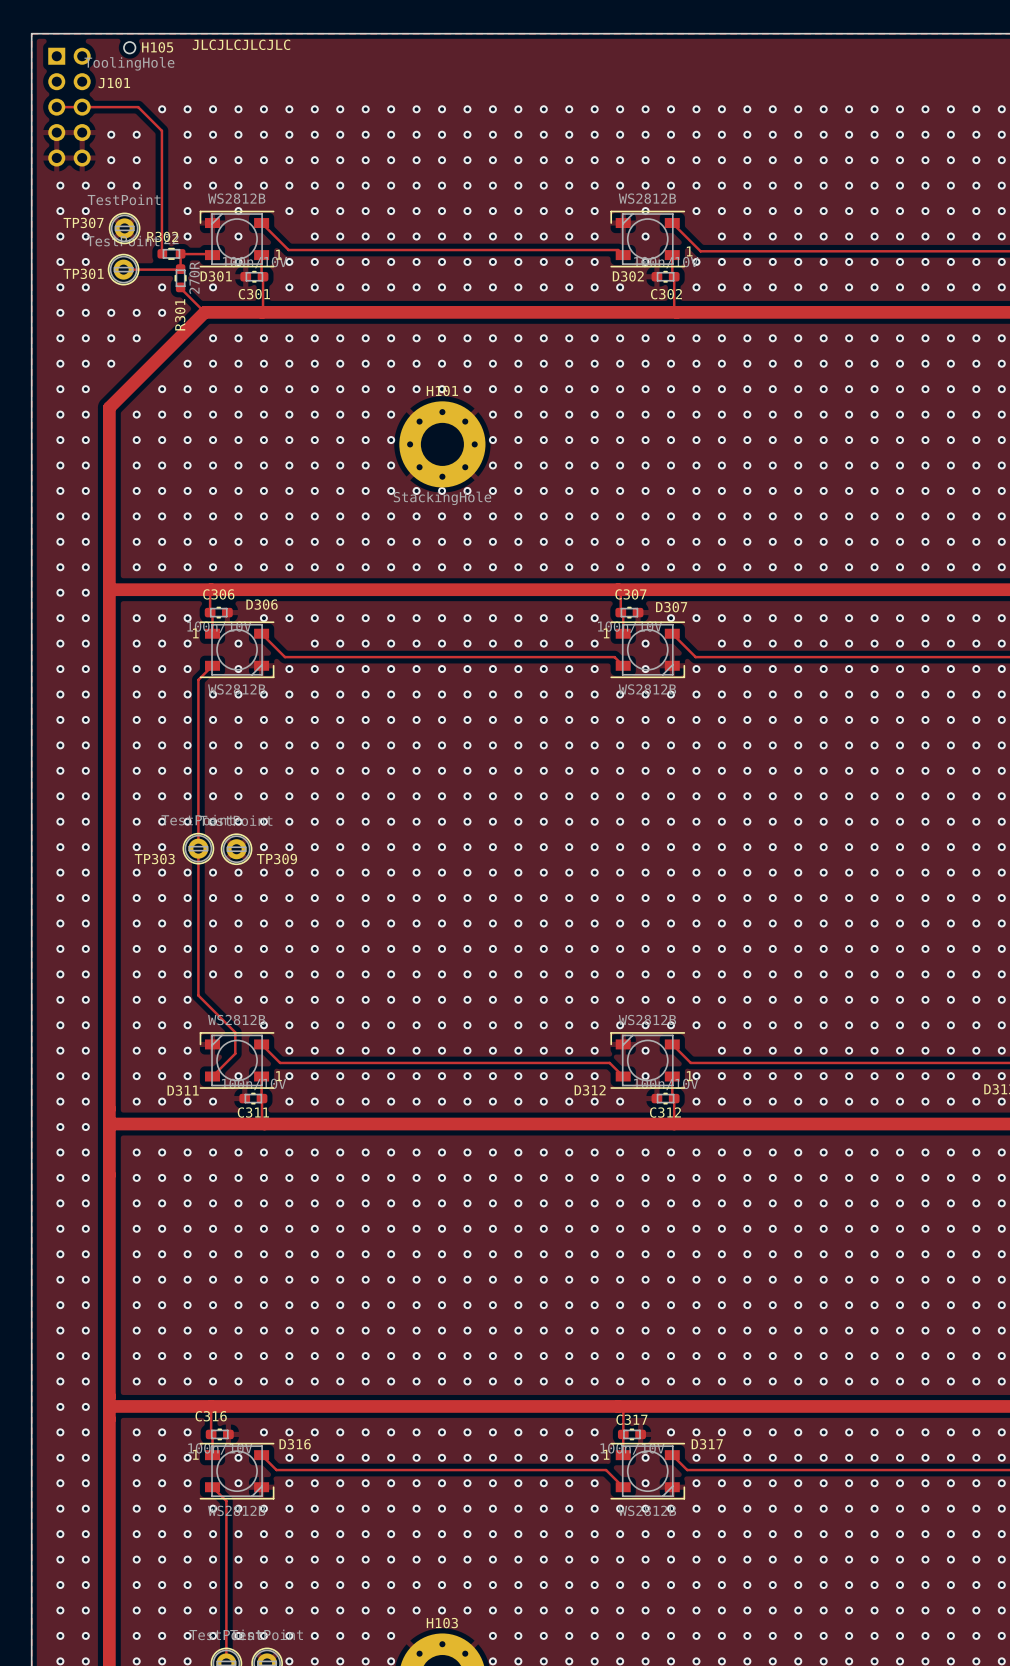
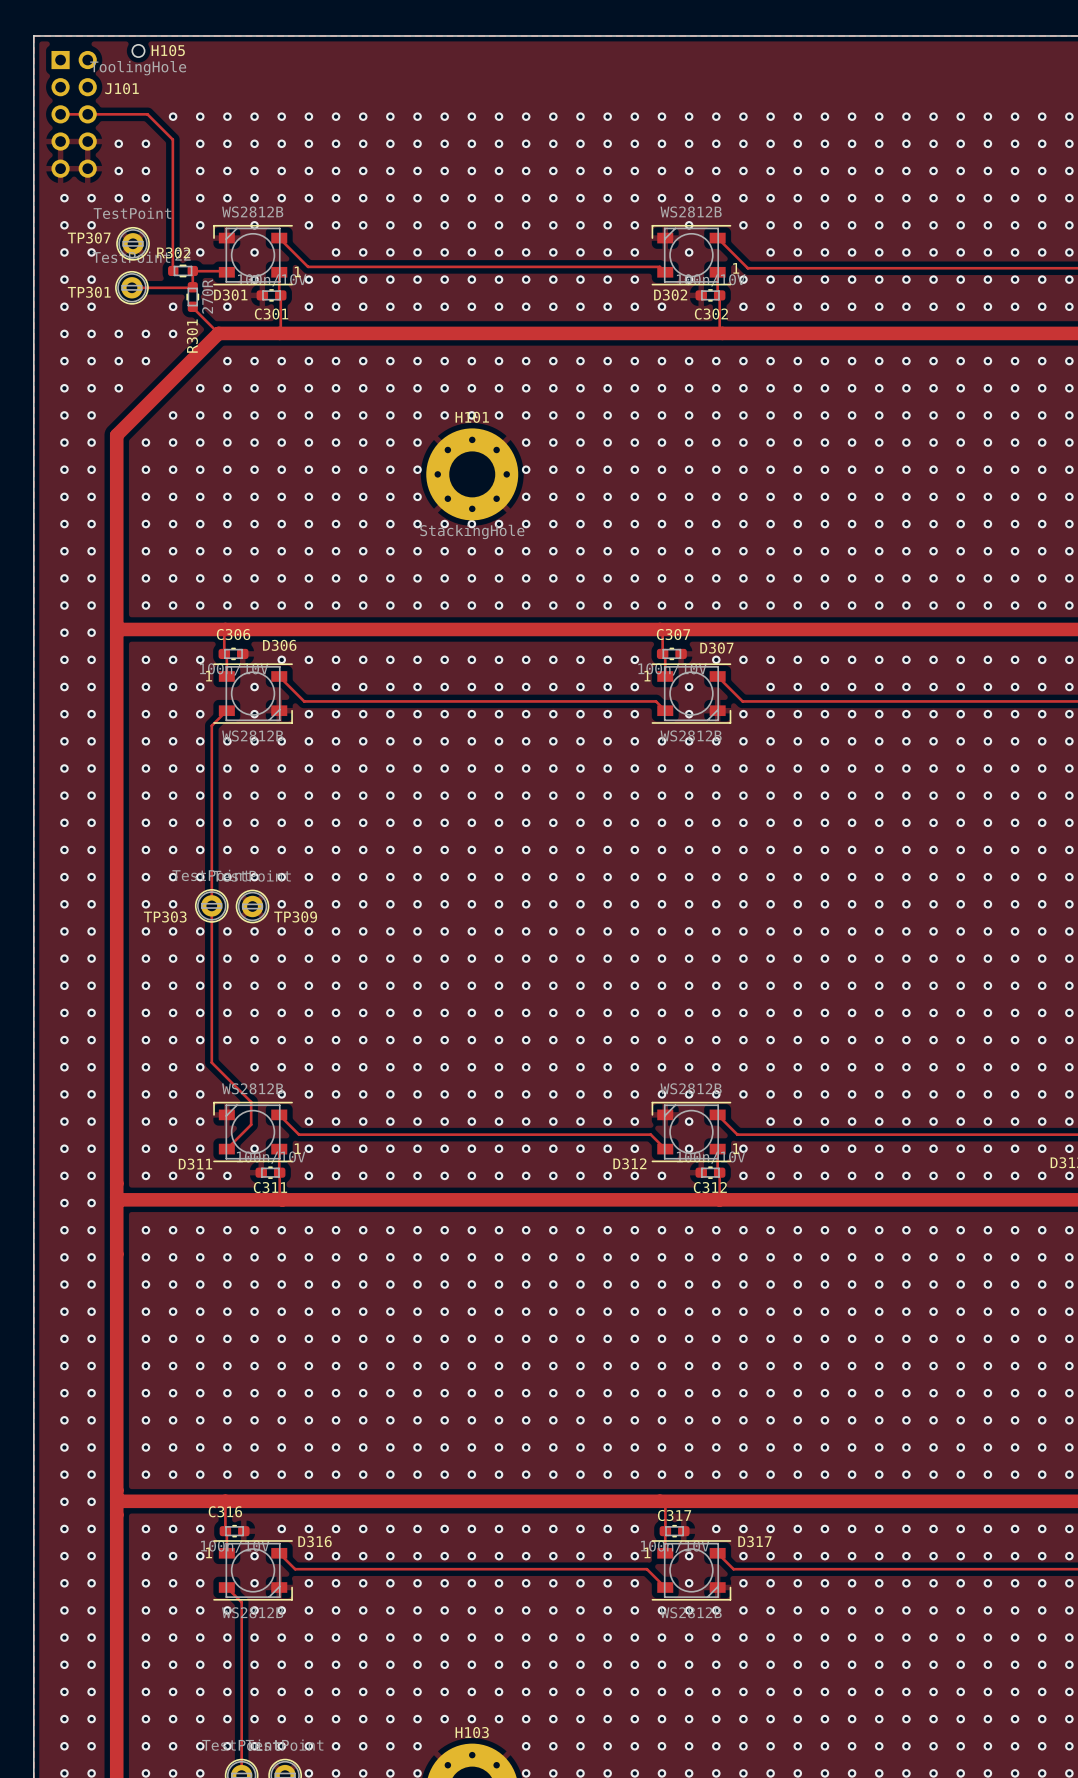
text: JLCJLCJLCJLC (241, 44) -> none

